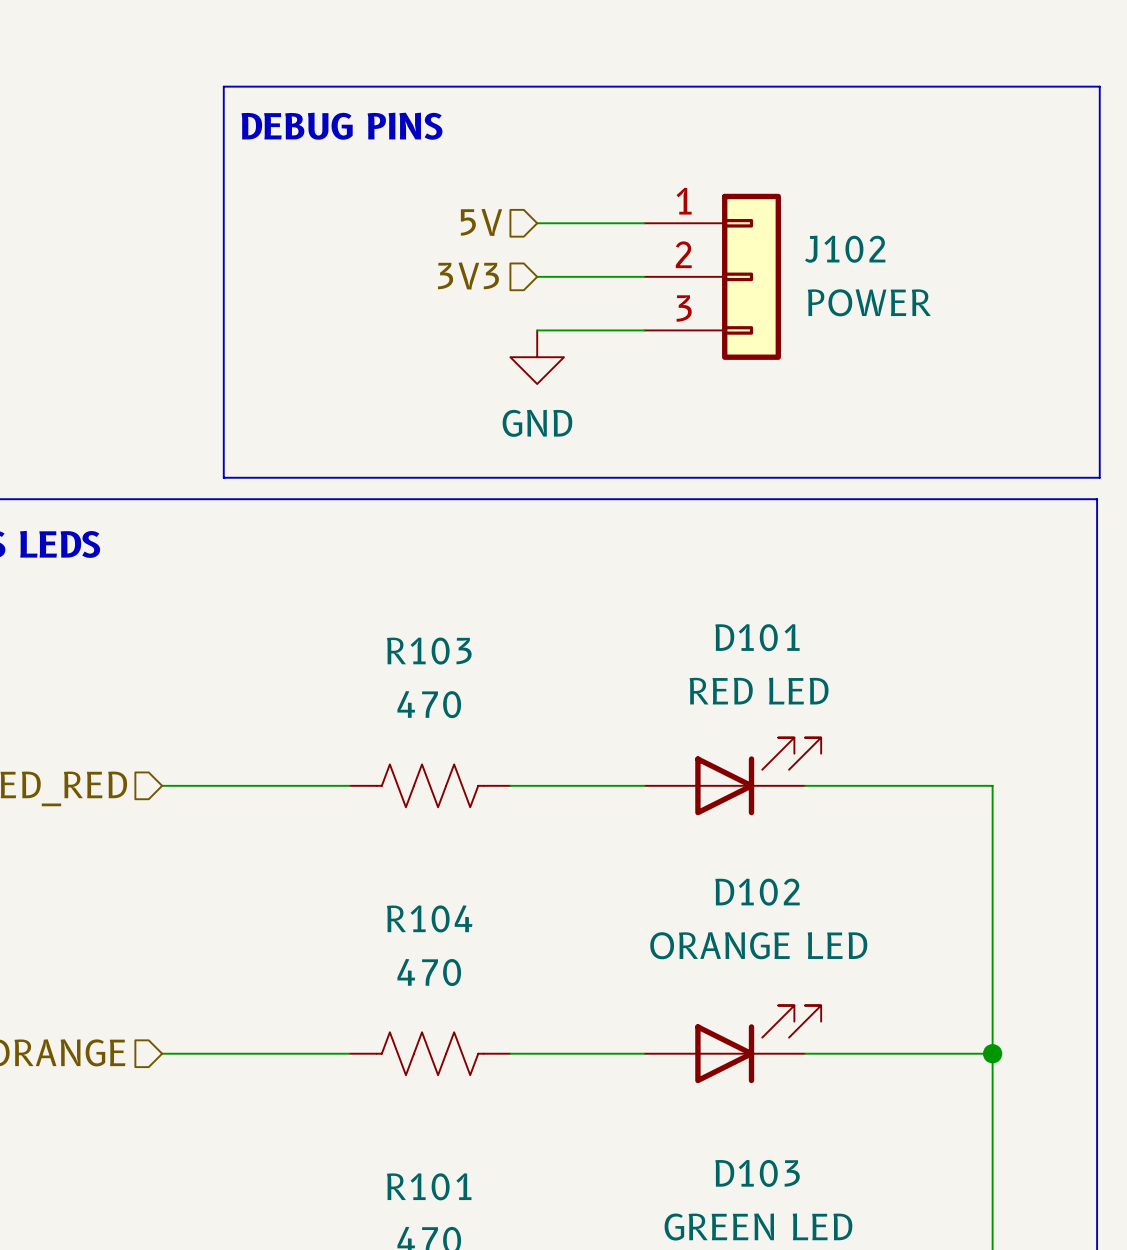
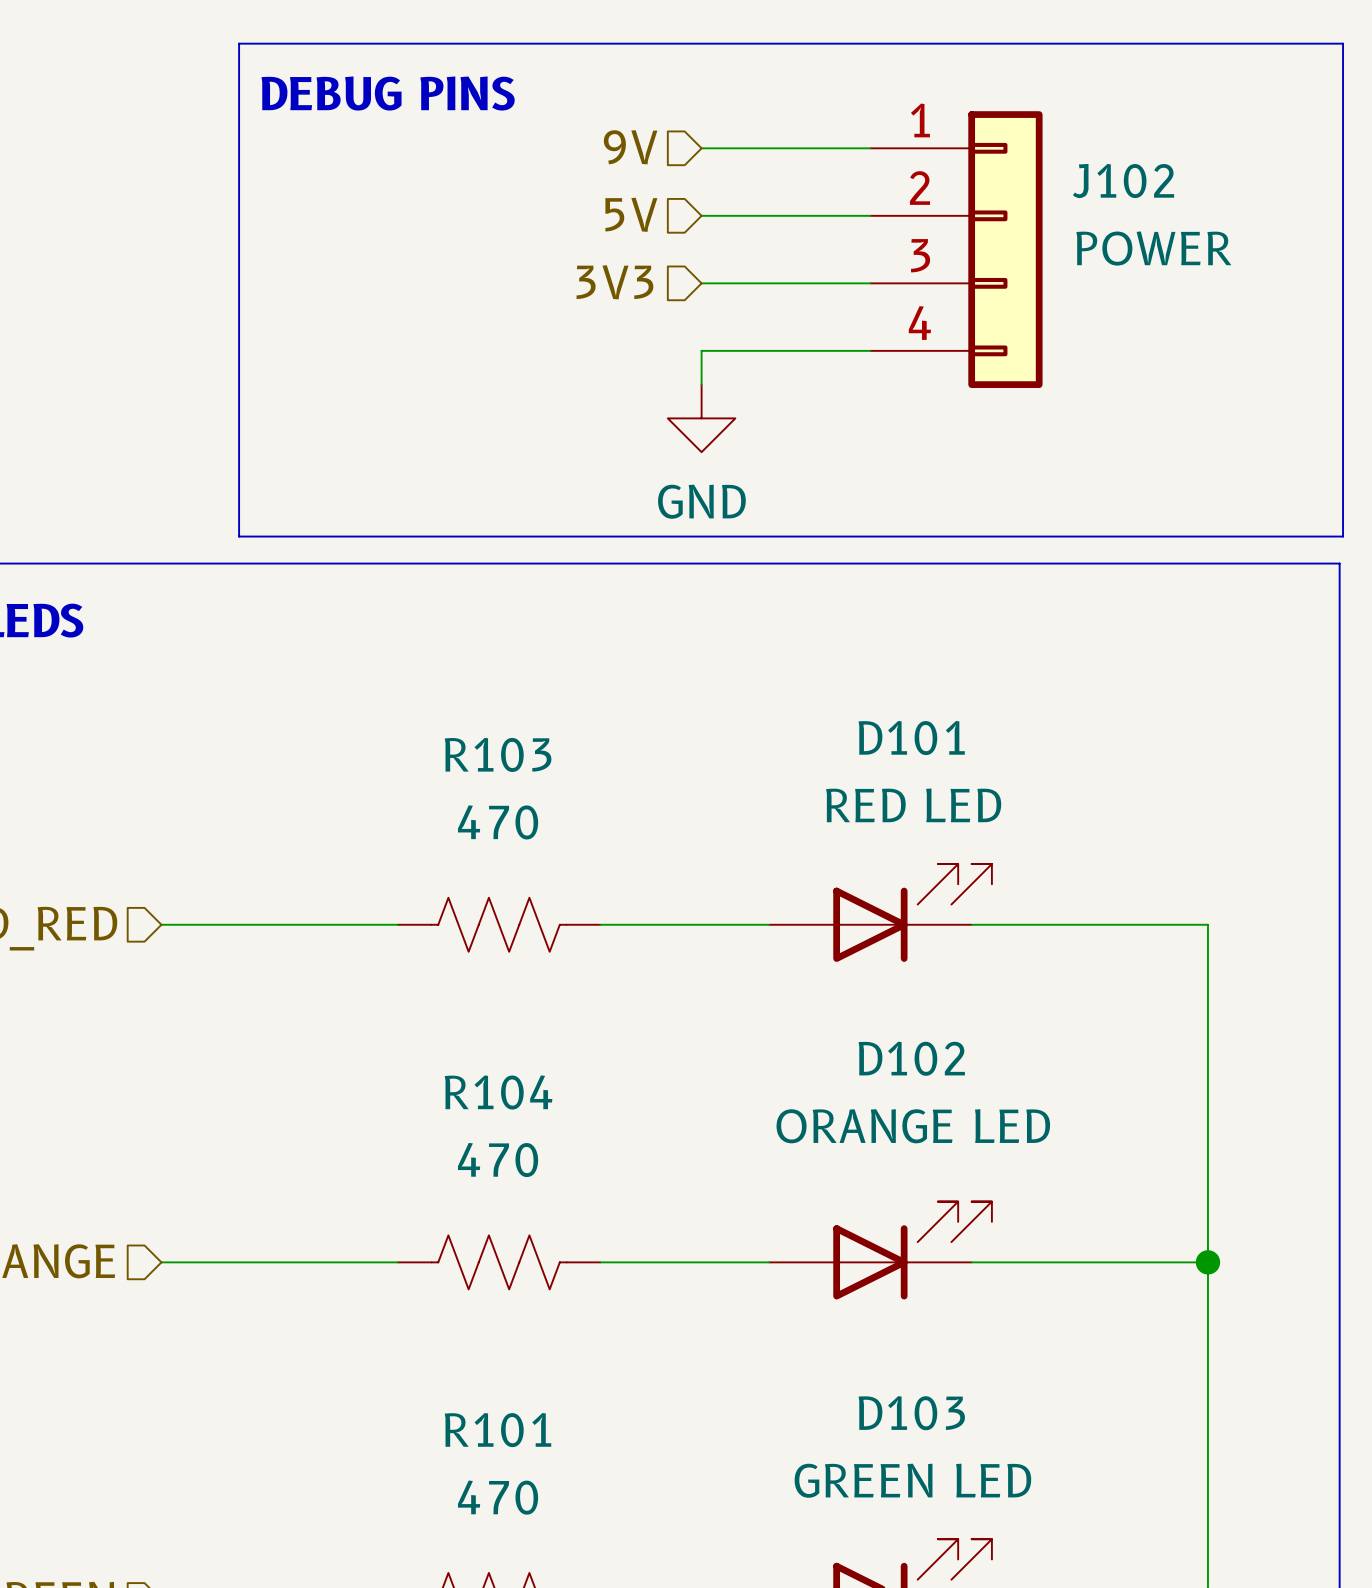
hierarchical label: none -> 9V (630, 147)
wire: none -> (701, 148) (870, 148)
J102 symbol: [644, 193, 781, 360] -> [870, 111, 1043, 389]
hierarchical label position: 5V (481, 222) -> 5V (631, 214)
wire: (537, 223) (590, 223) -> none
hierarchical label position: 3V3 (468, 276) -> 3V3 (614, 282)
wire: (537, 276) (590, 276) -> none
wire: (537, 330) (590, 330) -> (701, 384) (701, 350)
power symbol position: GND (537, 357) -> GND (701, 418)

